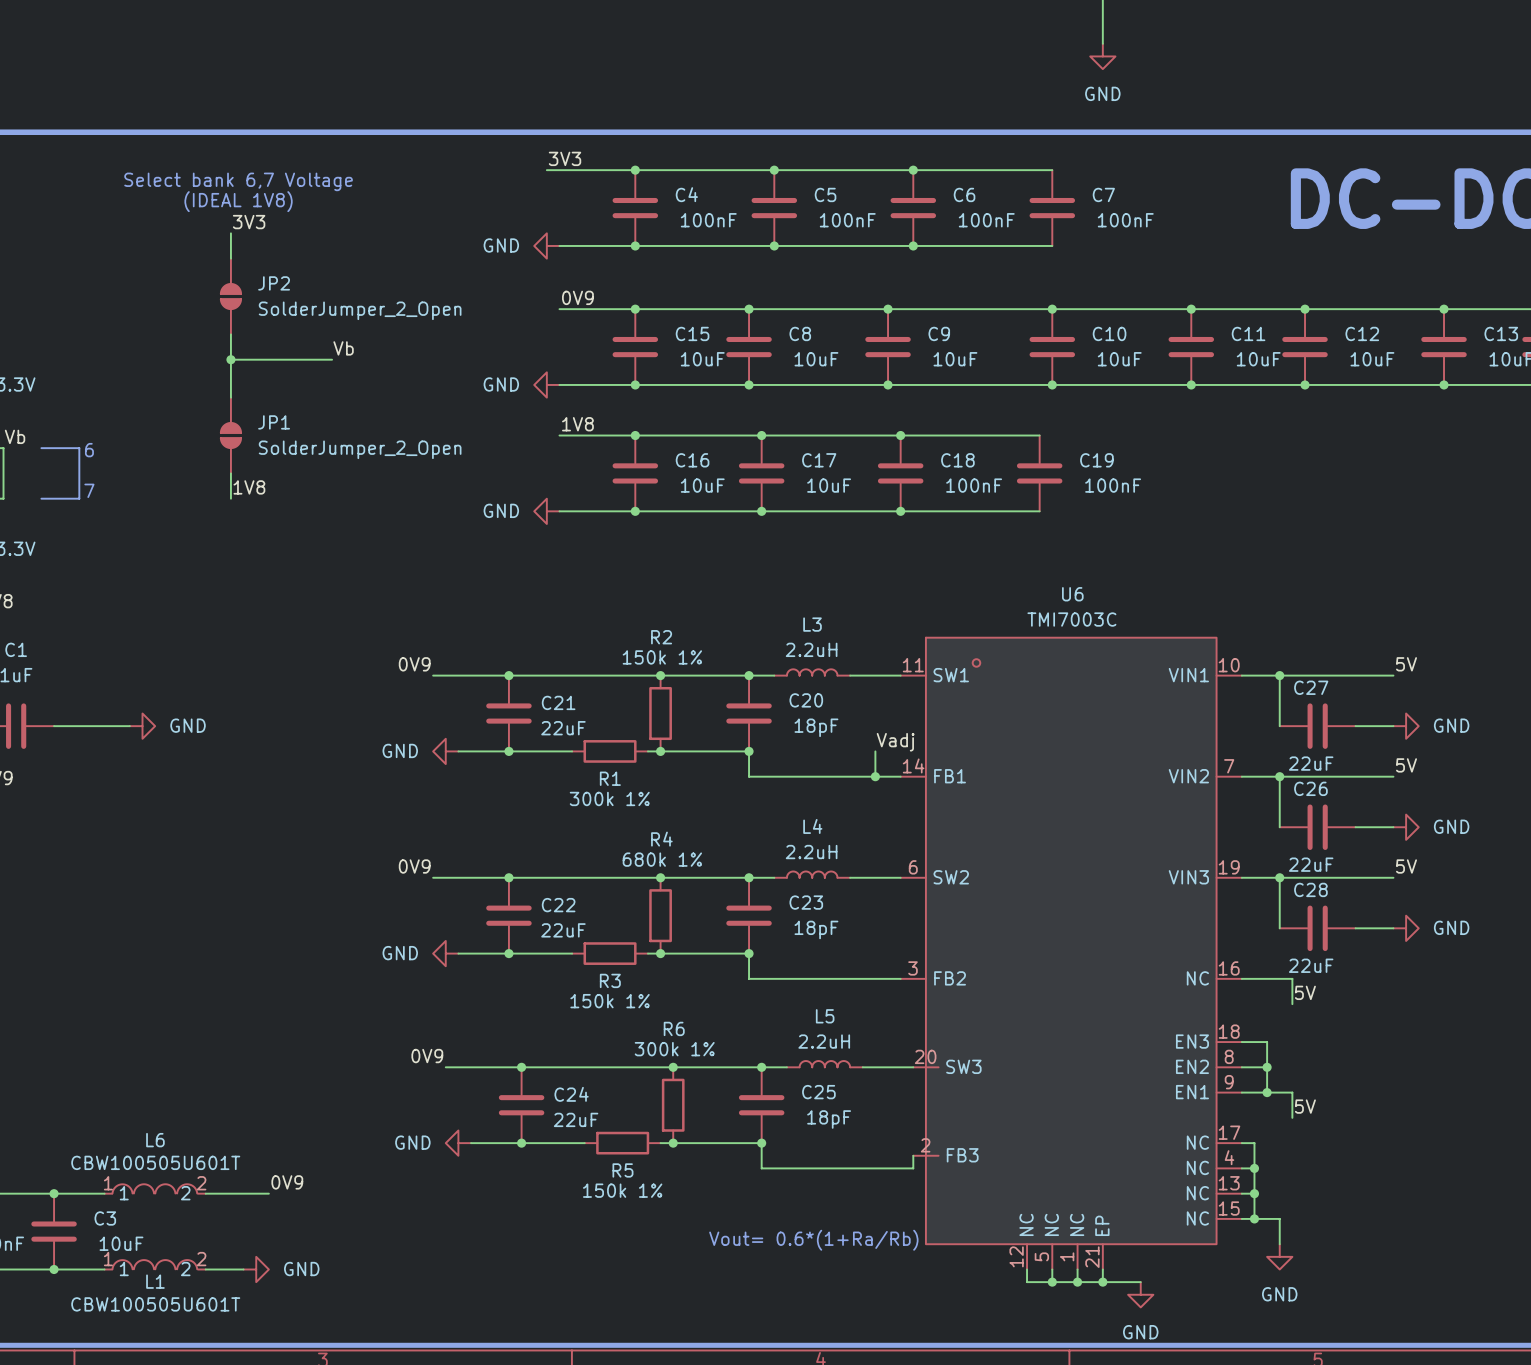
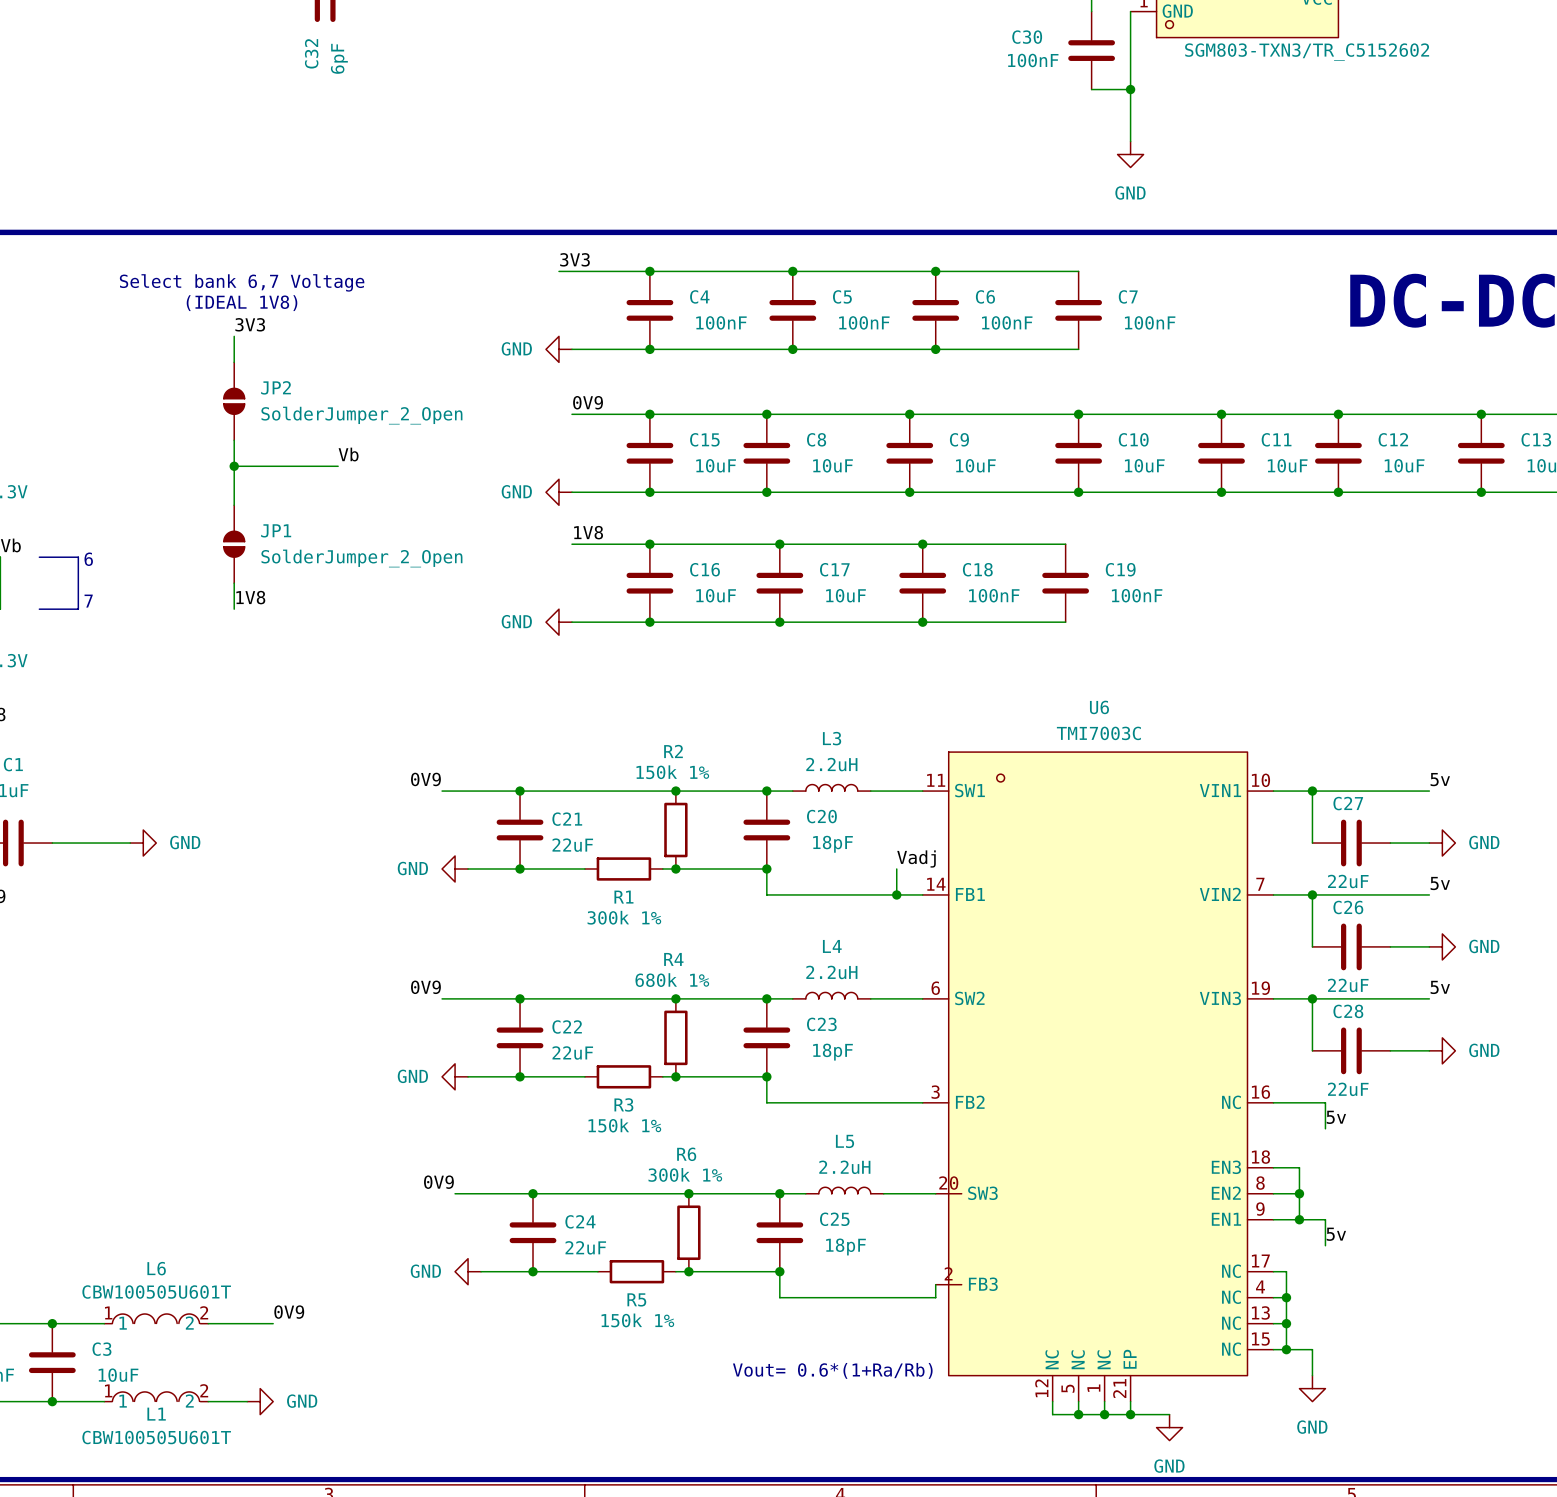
label: 5V (1406, 664) -> 5v (1440, 779)
label: 5V (1406, 765) -> 5v (1440, 883)
label: 5V (1406, 866) -> 5v (1440, 987)
label: 5V (1305, 992) -> 5v (1336, 1117)
label: 5V (1305, 1106) -> 5v (1336, 1234)

